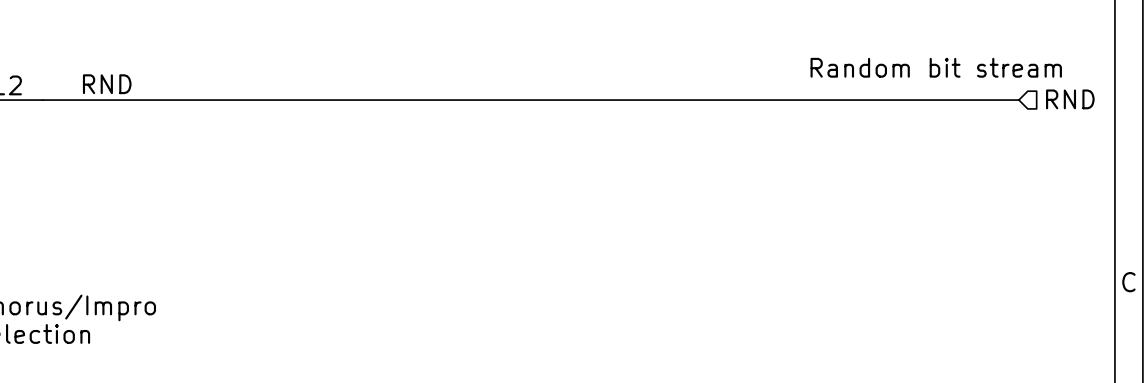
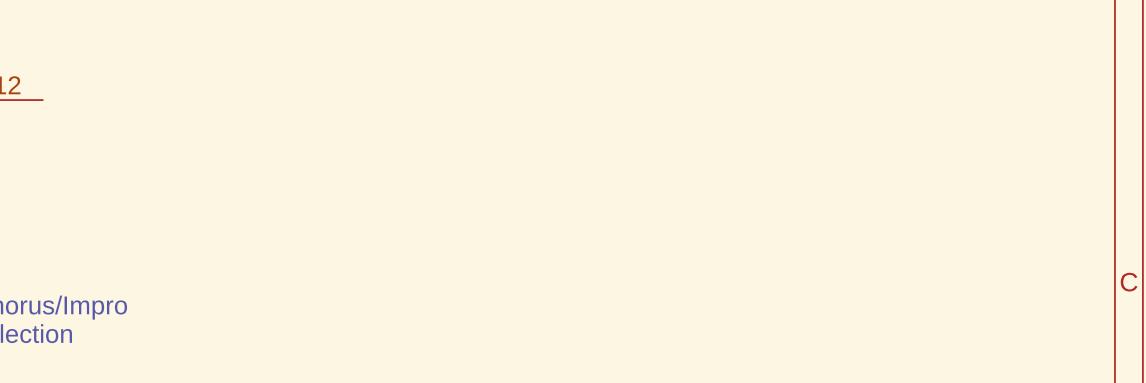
text: Random bit stream (936, 67) -> none
label: RND (107, 84) -> none
hierarchical label: RND (1070, 99) -> none
wire: (42, 100) (1018, 100) -> none

